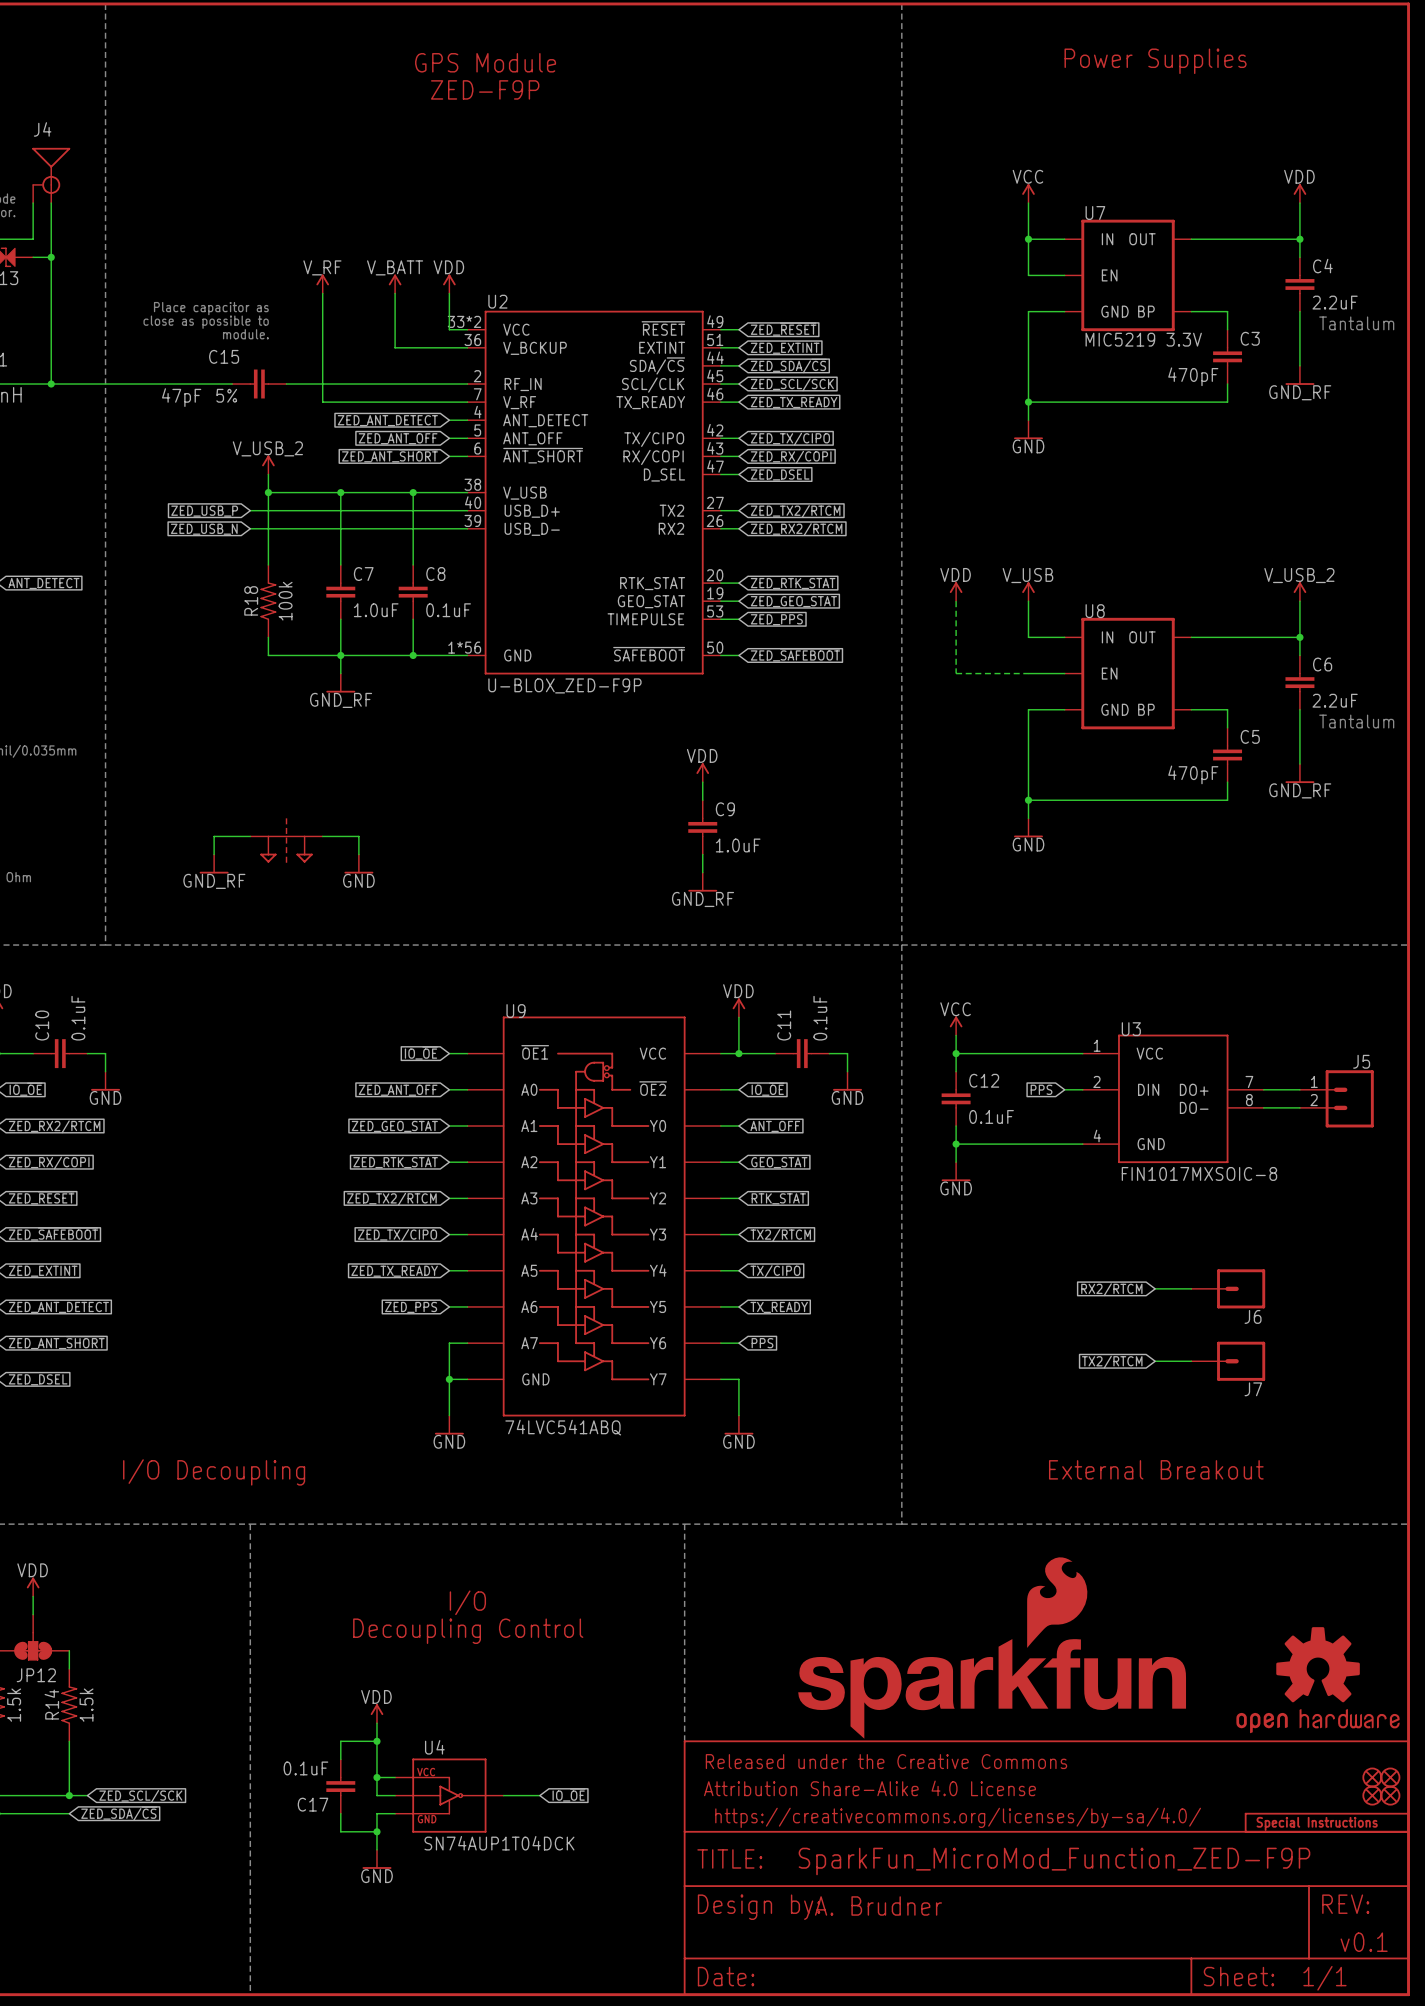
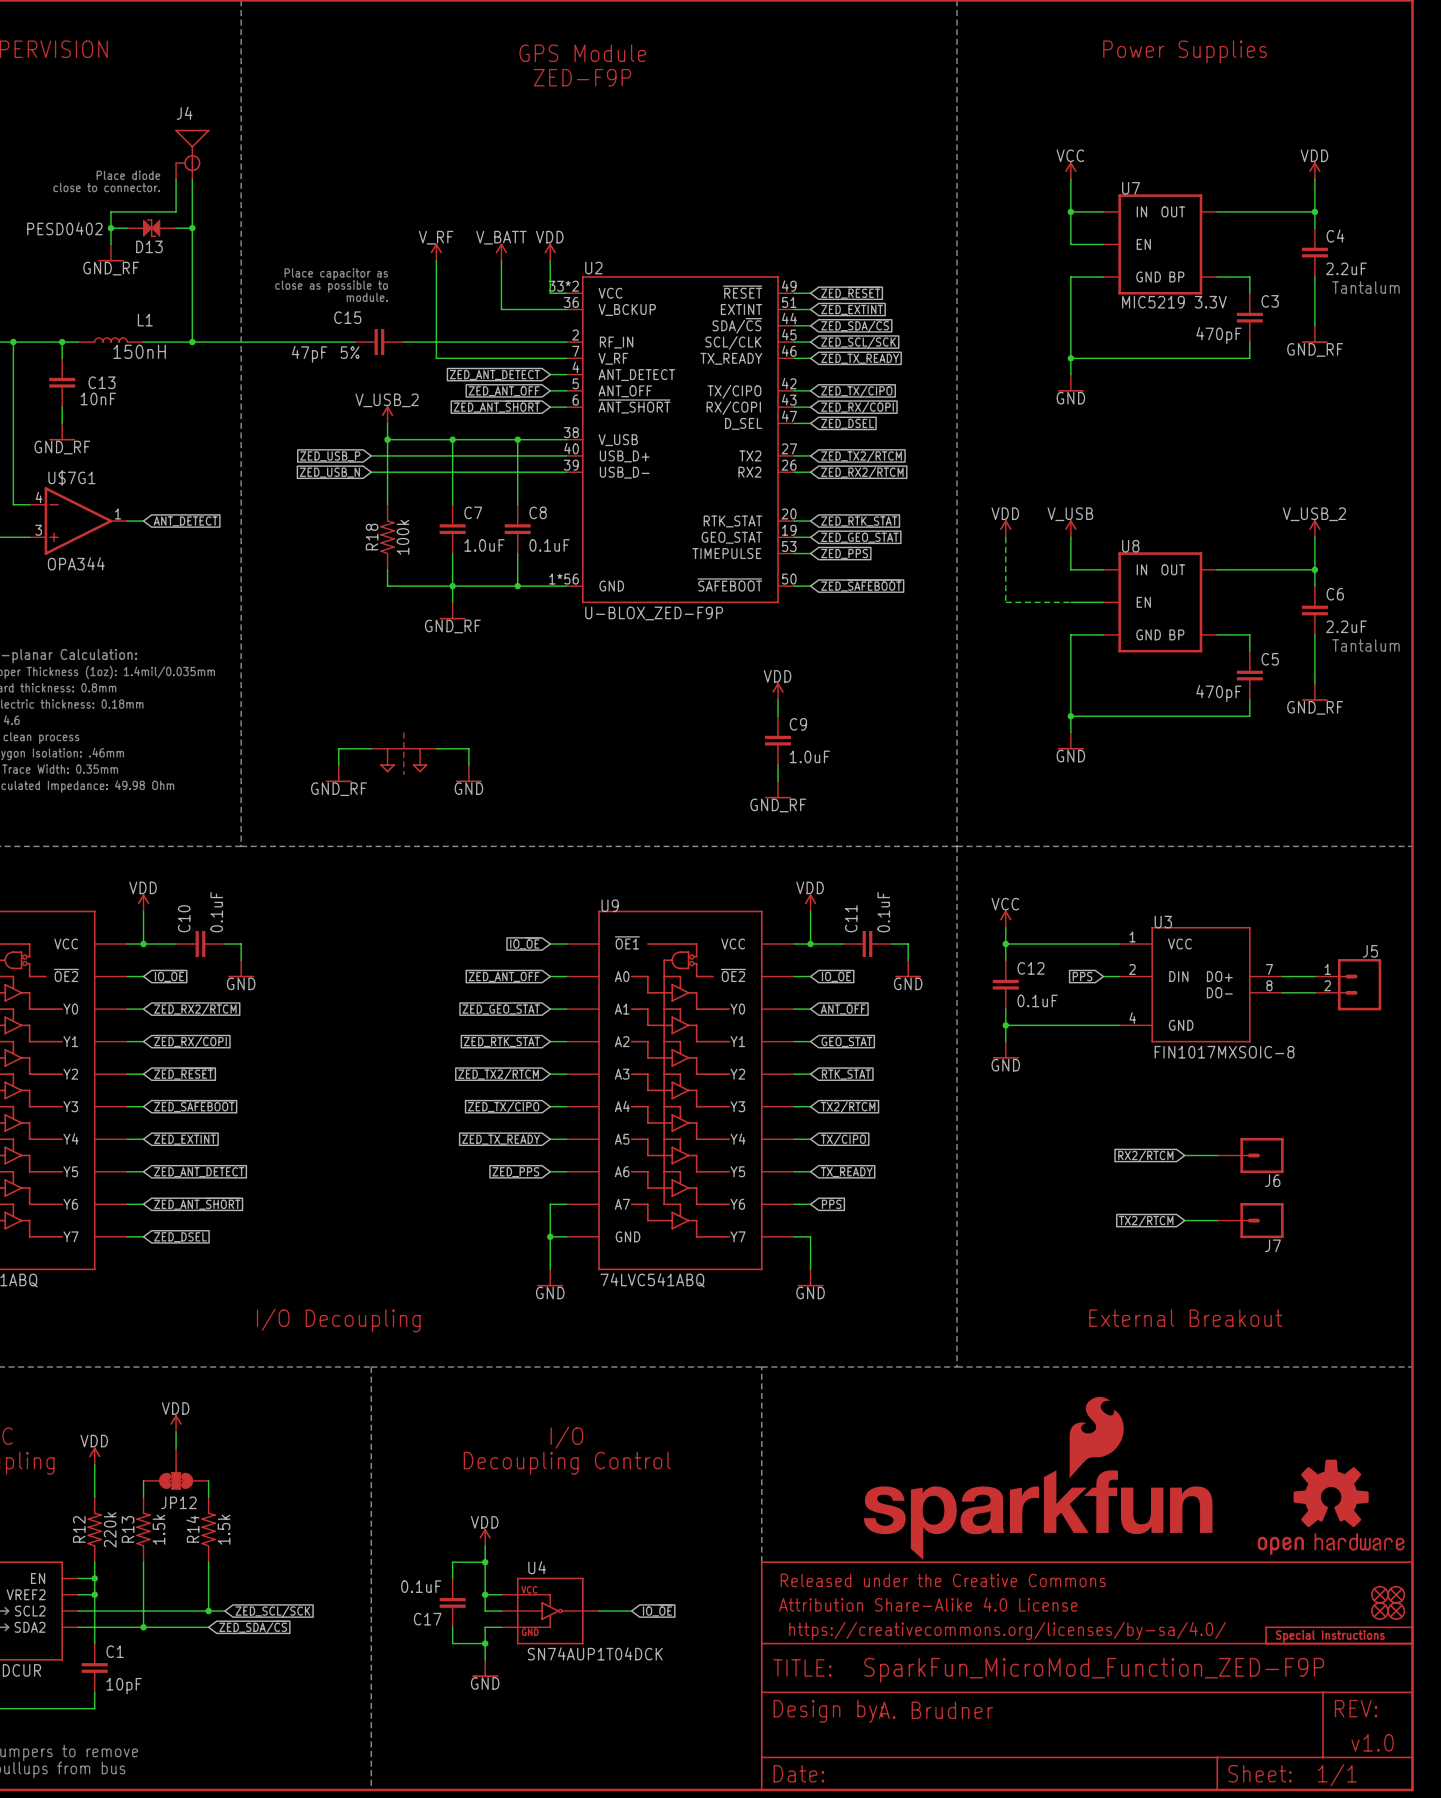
text: v0.1 (1364, 1942) -> v1.0 (1372, 1742)

